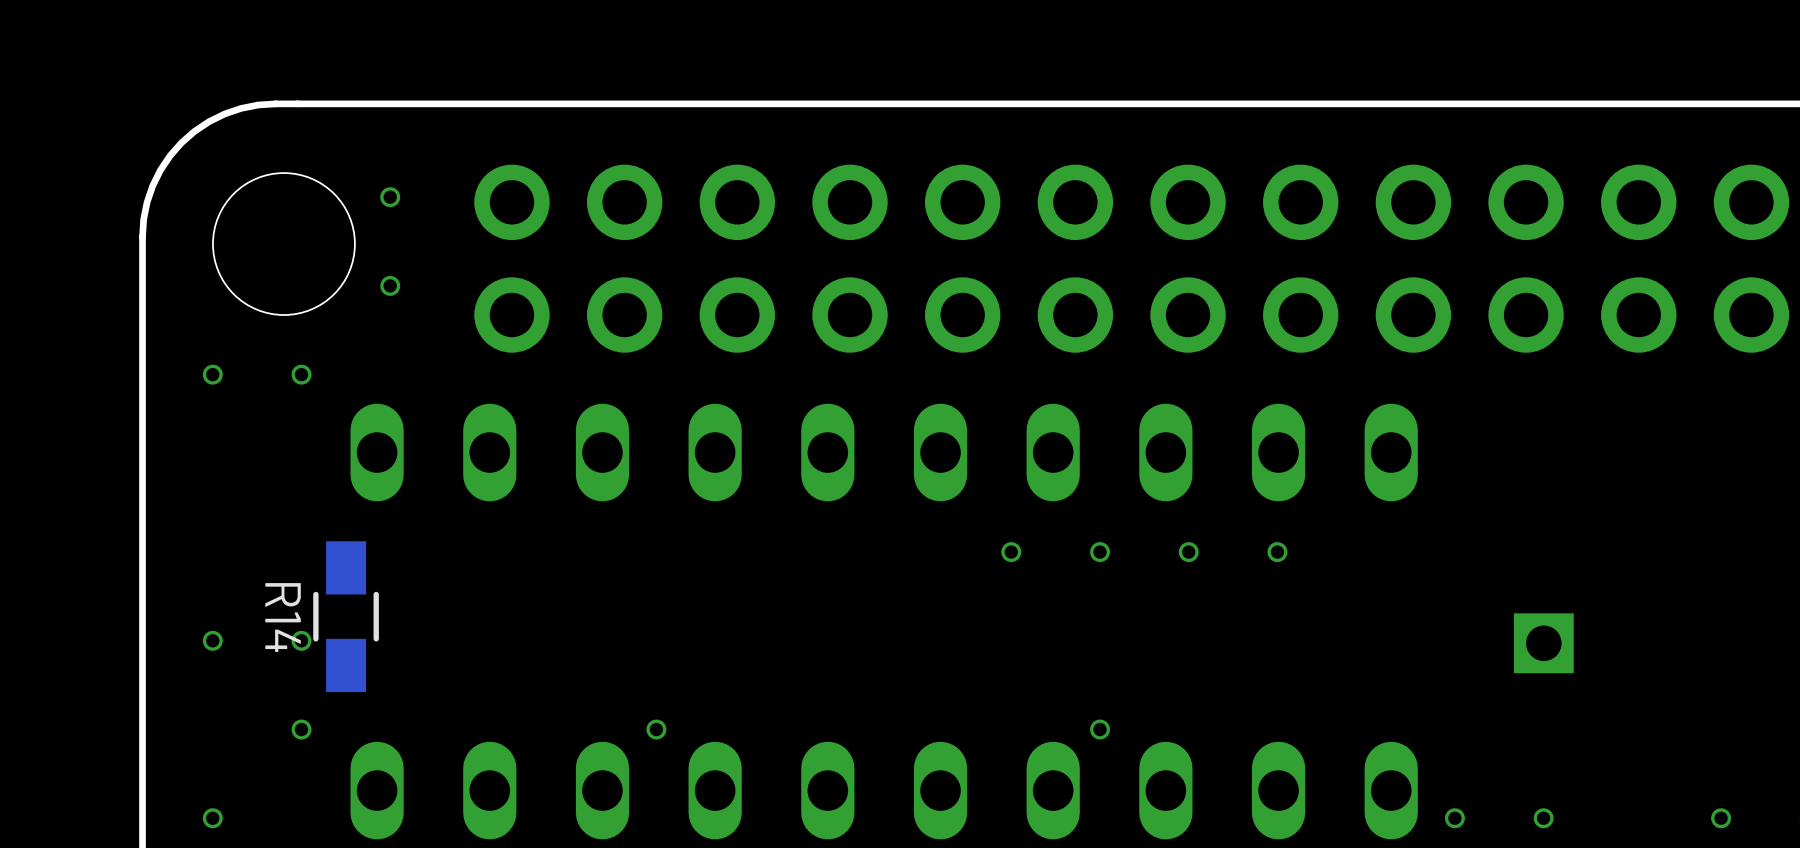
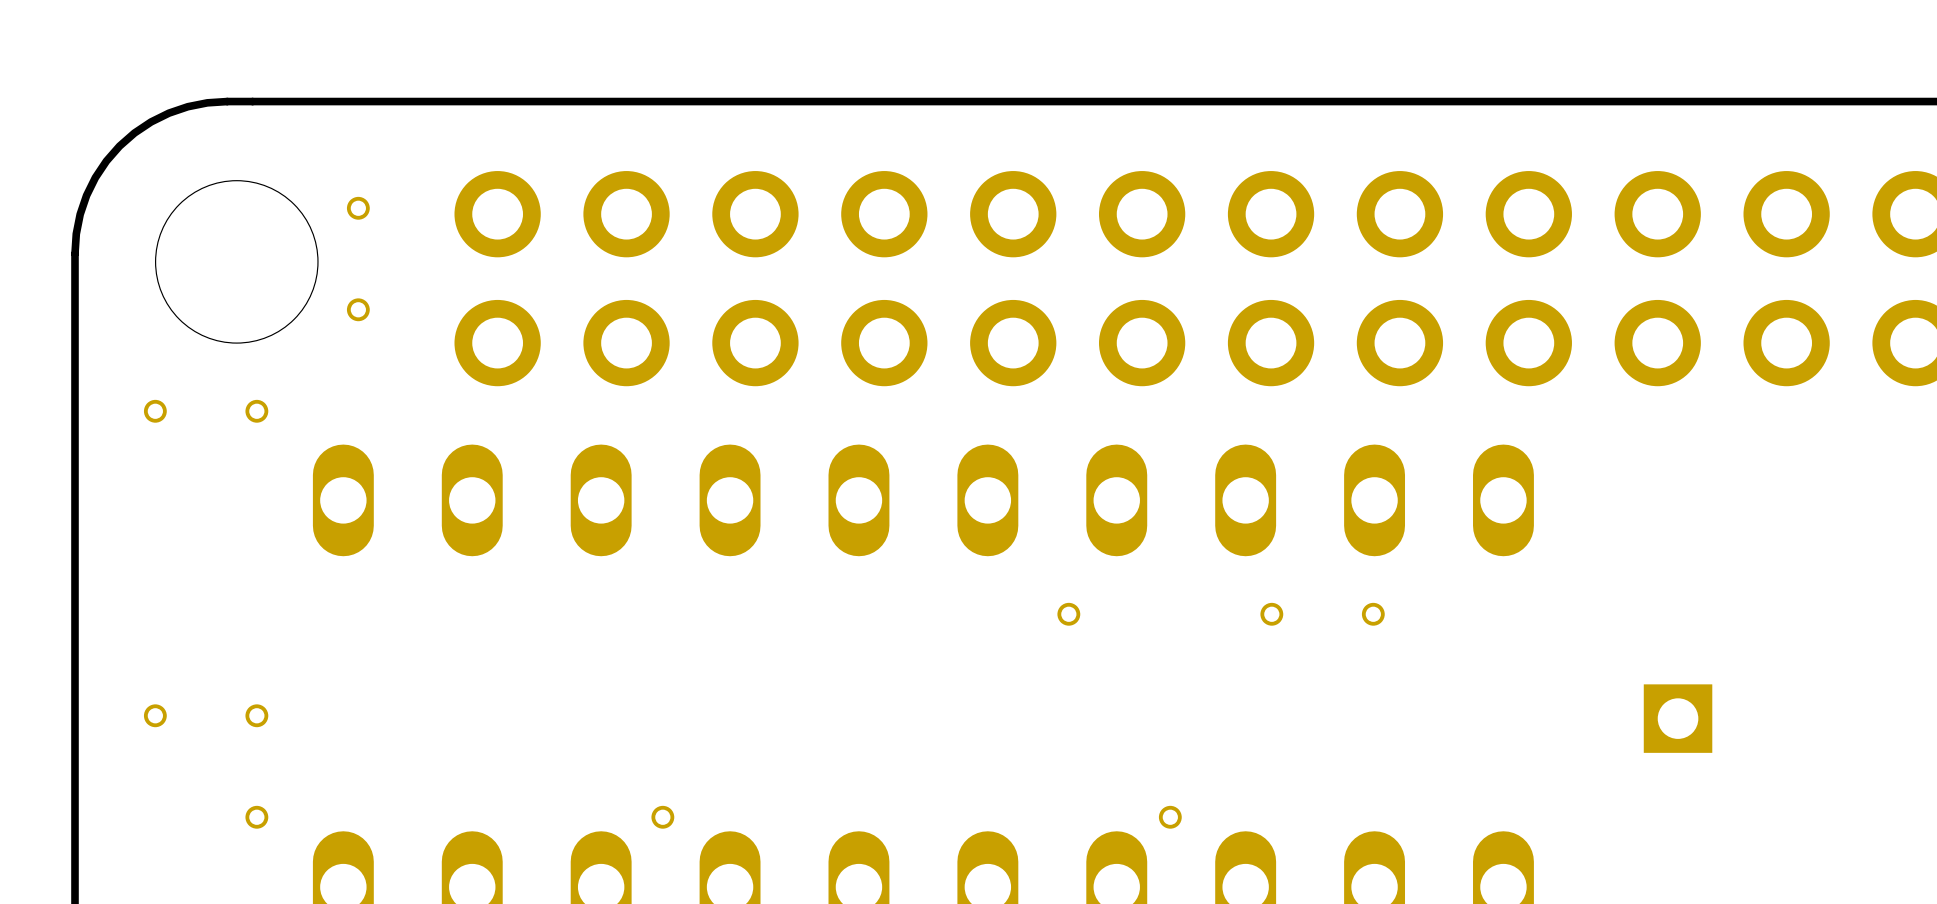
part: (1100, 552) -> none
R14: (346, 616) -> none

